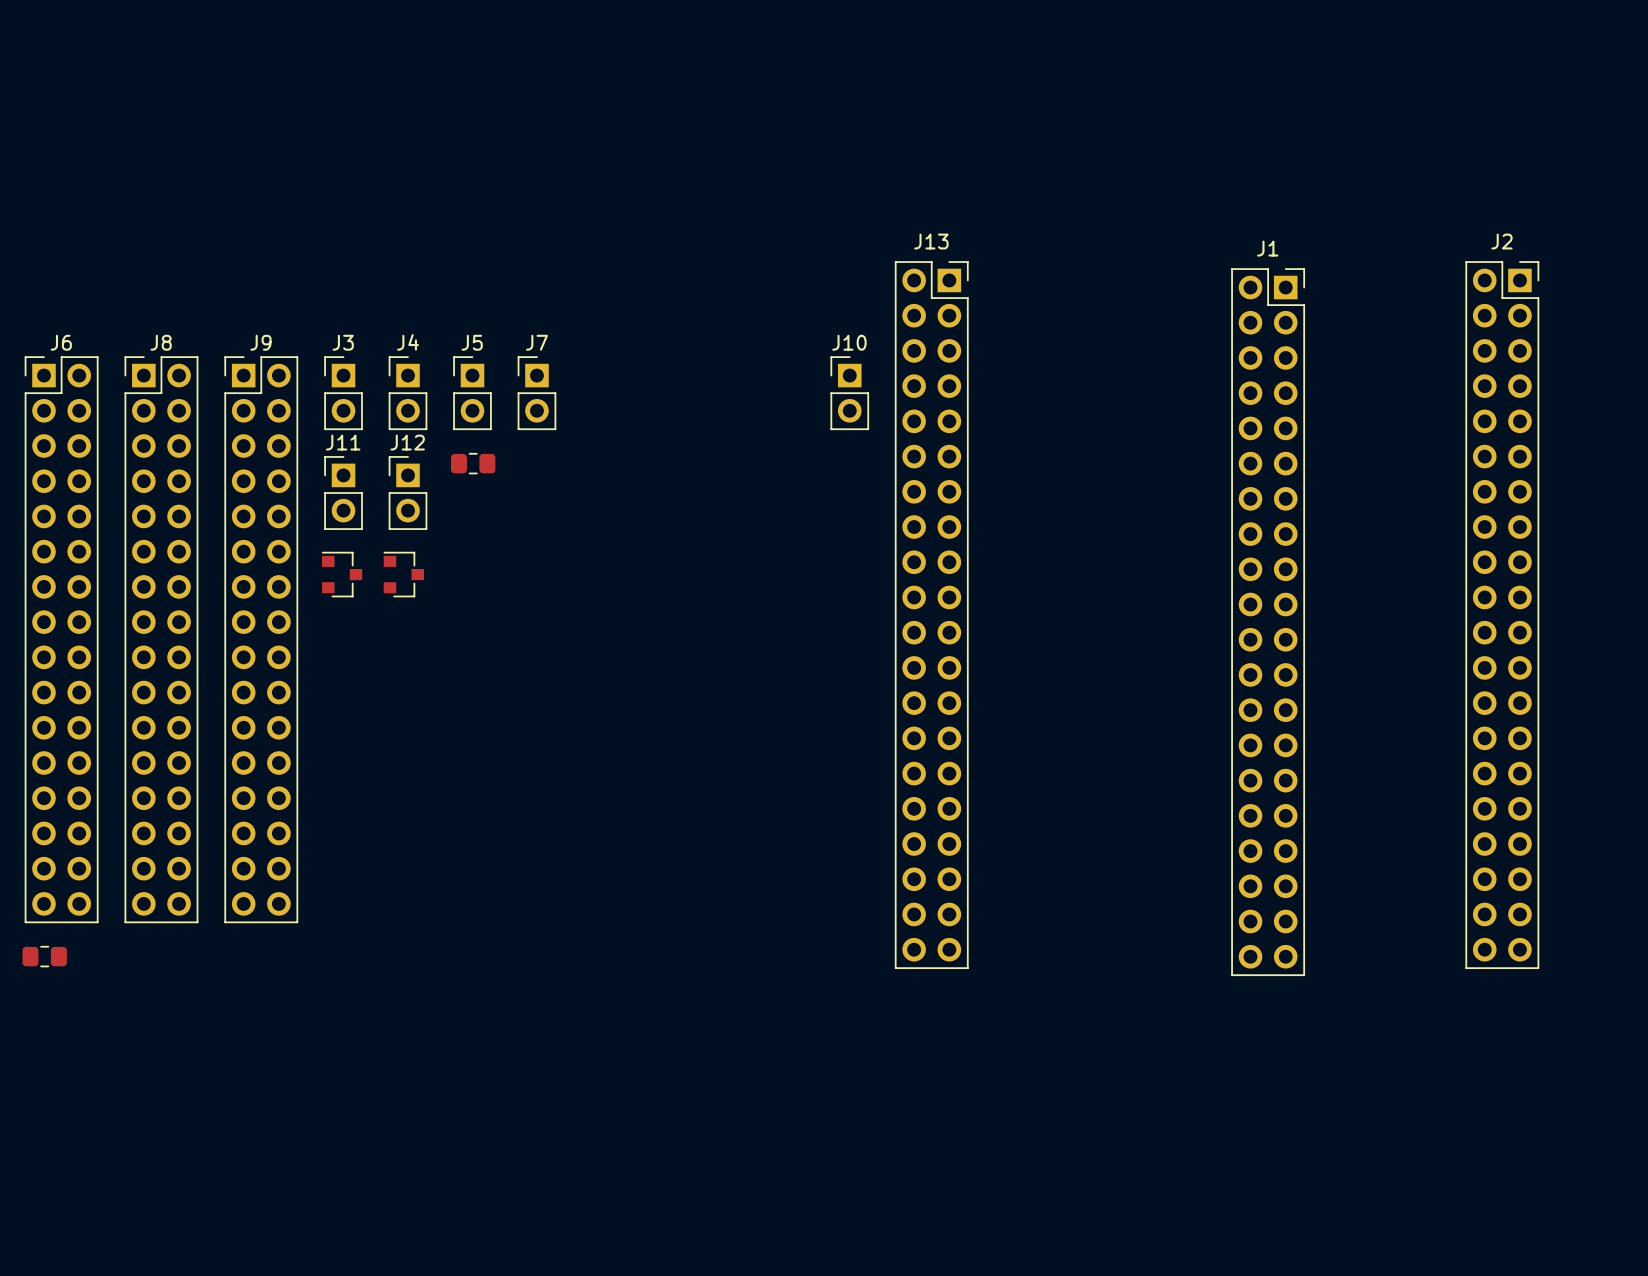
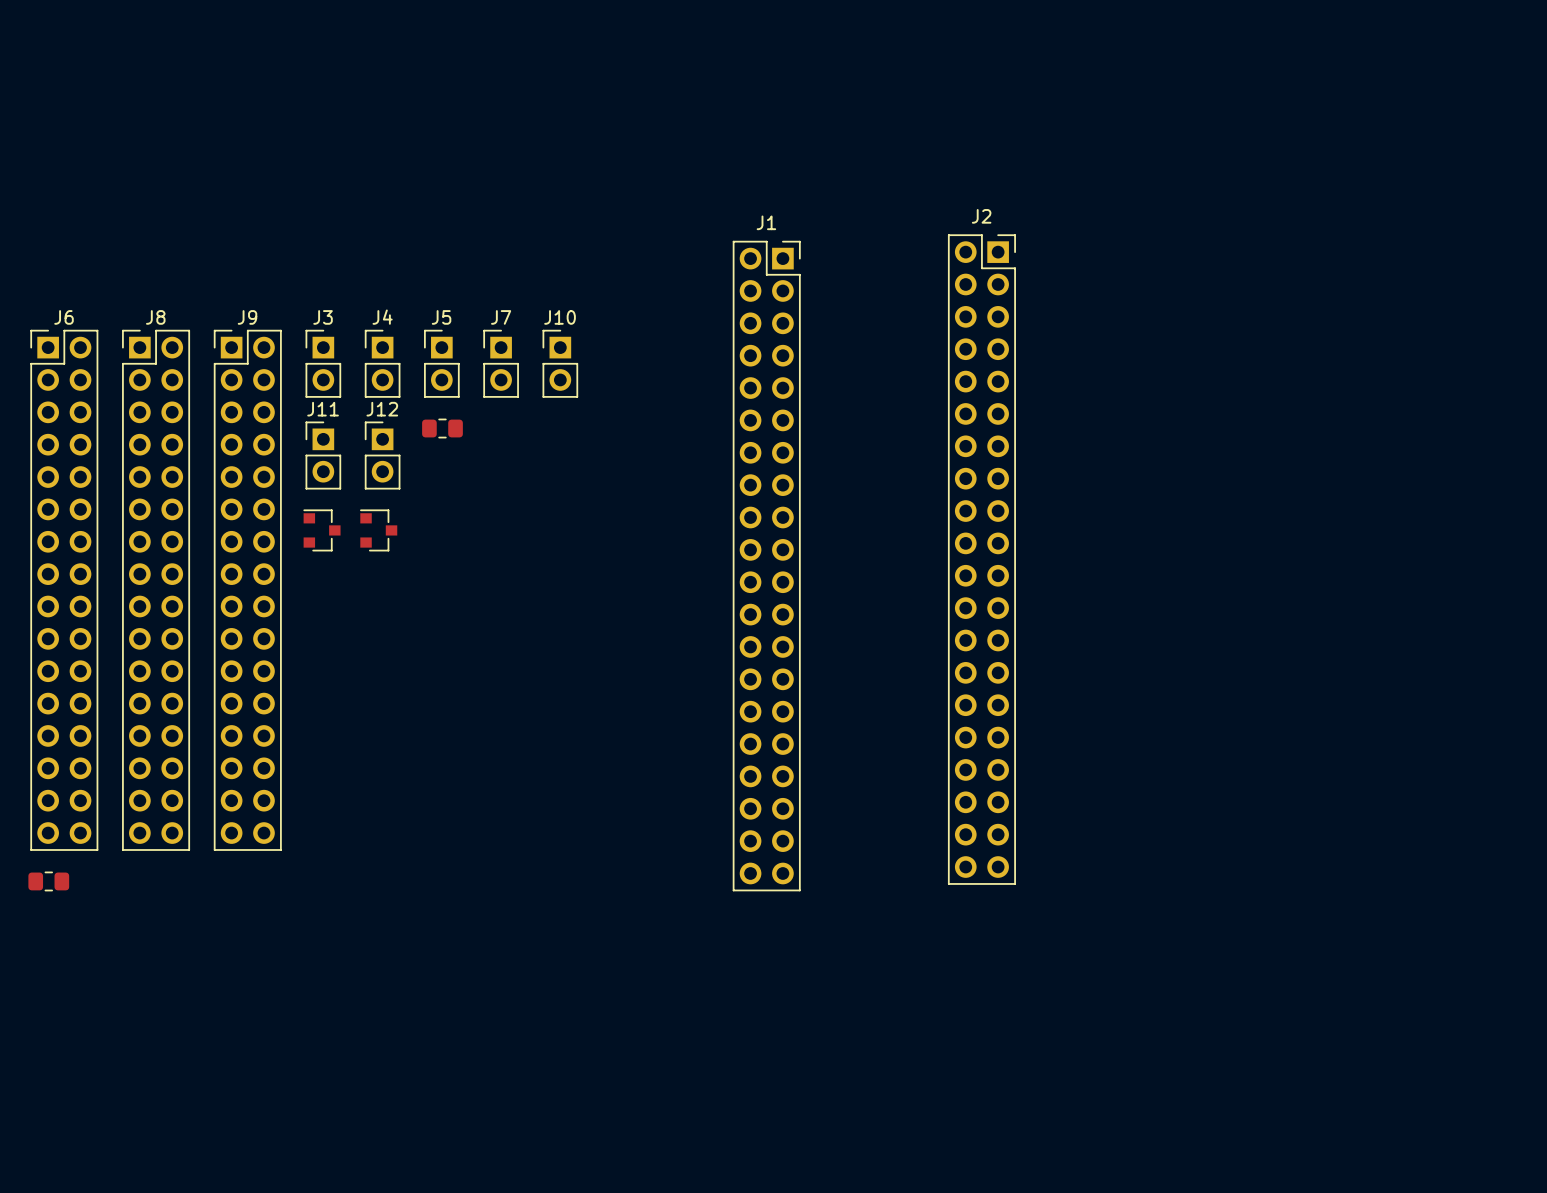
J10 position: (849, 393) -> (560, 363)
J13: (931, 615) -> none
J2 position: (1502, 615) -> (981, 559)
J1 position: (1268, 622) -> (766, 566)

